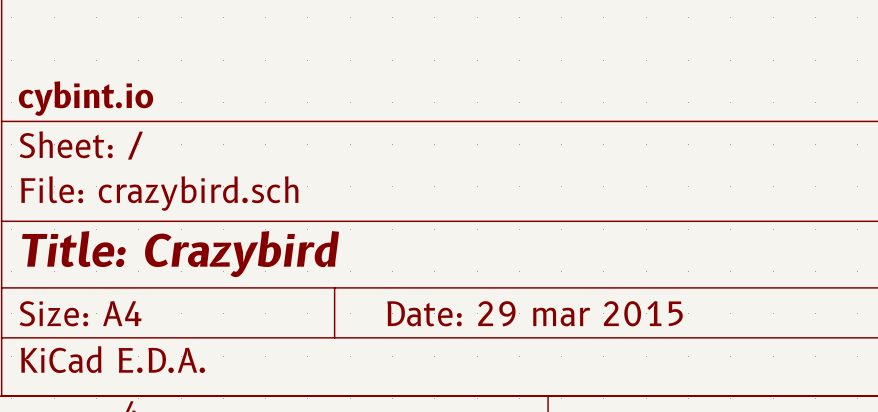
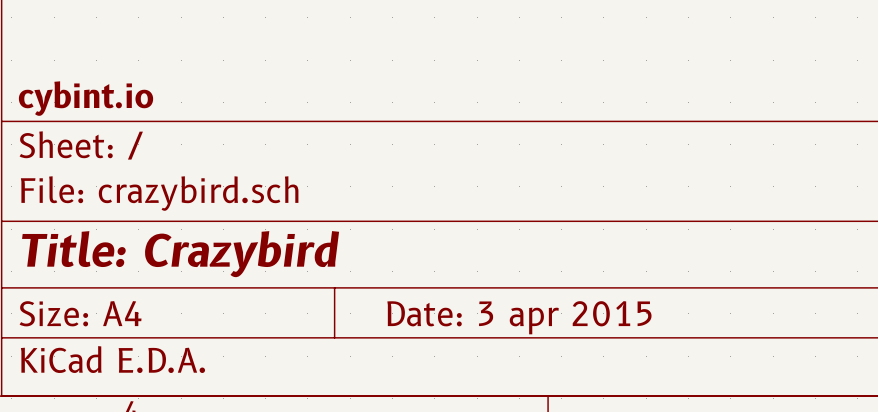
title block: Date: 29 mar 2015 (535, 313) -> Date: 3 apr 2015 (519, 317)

